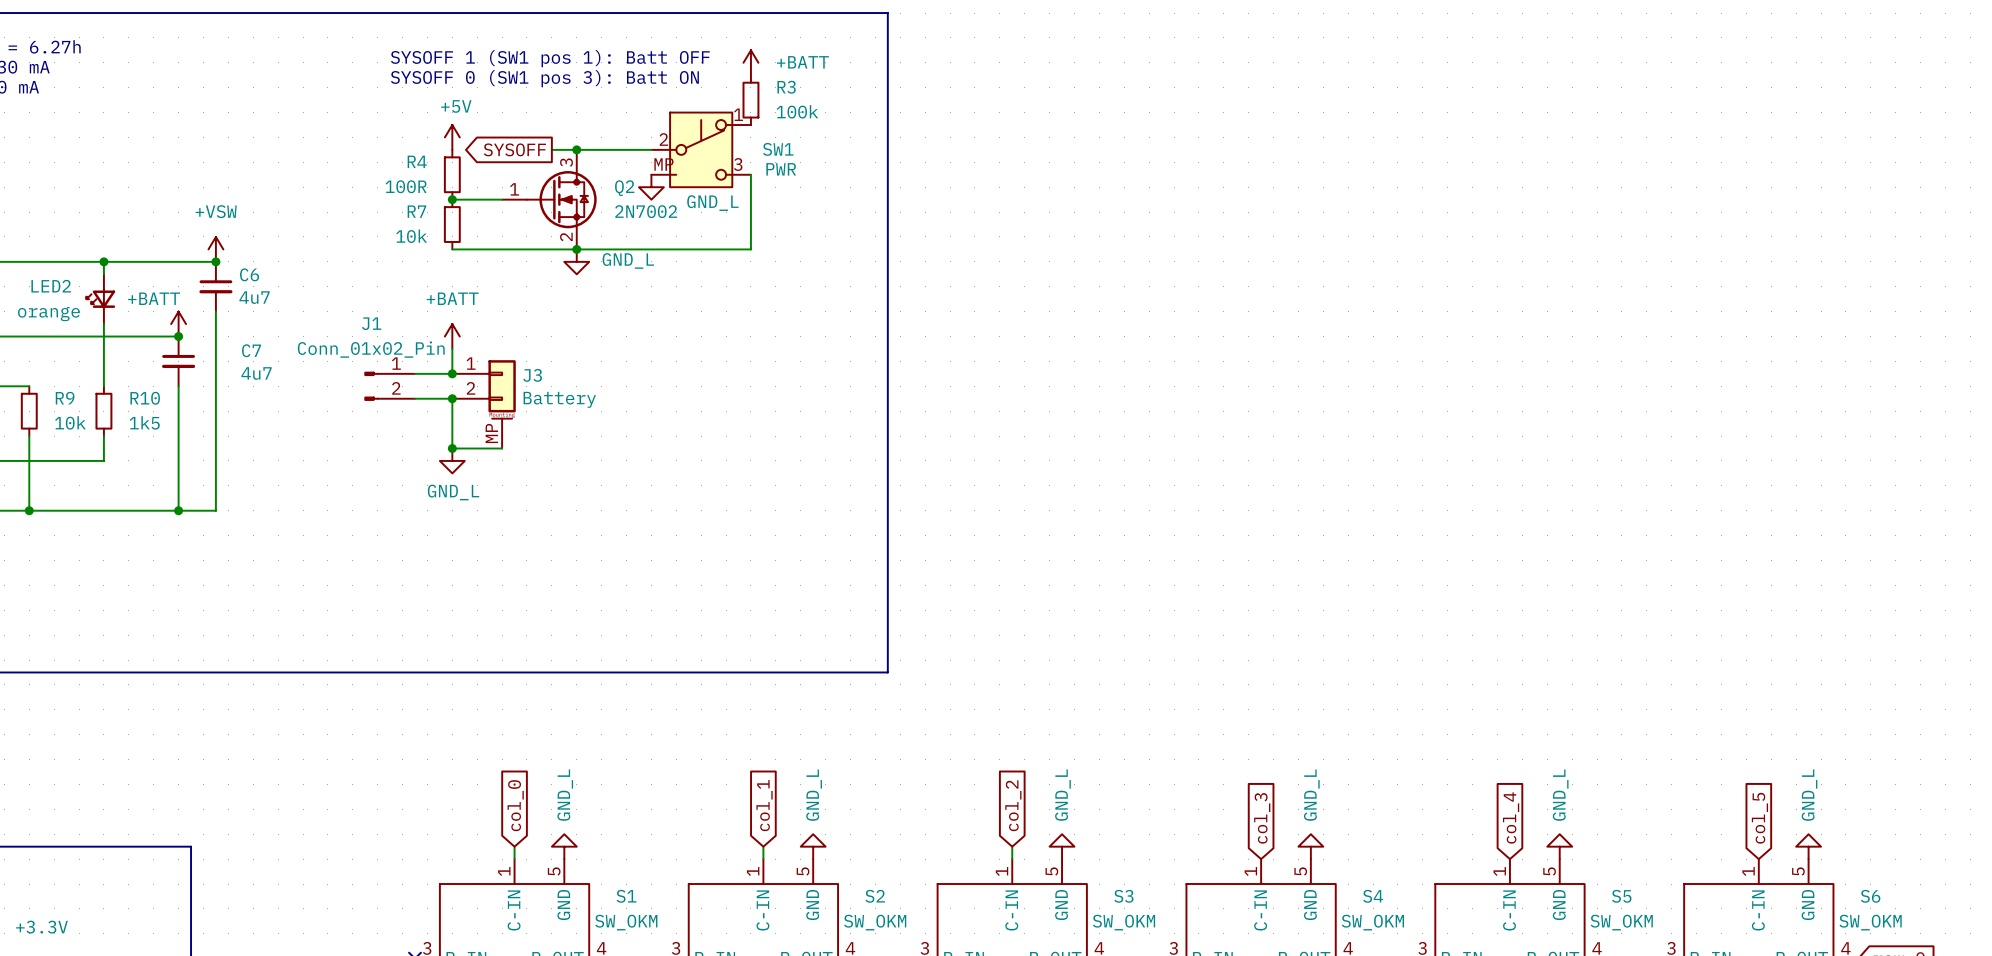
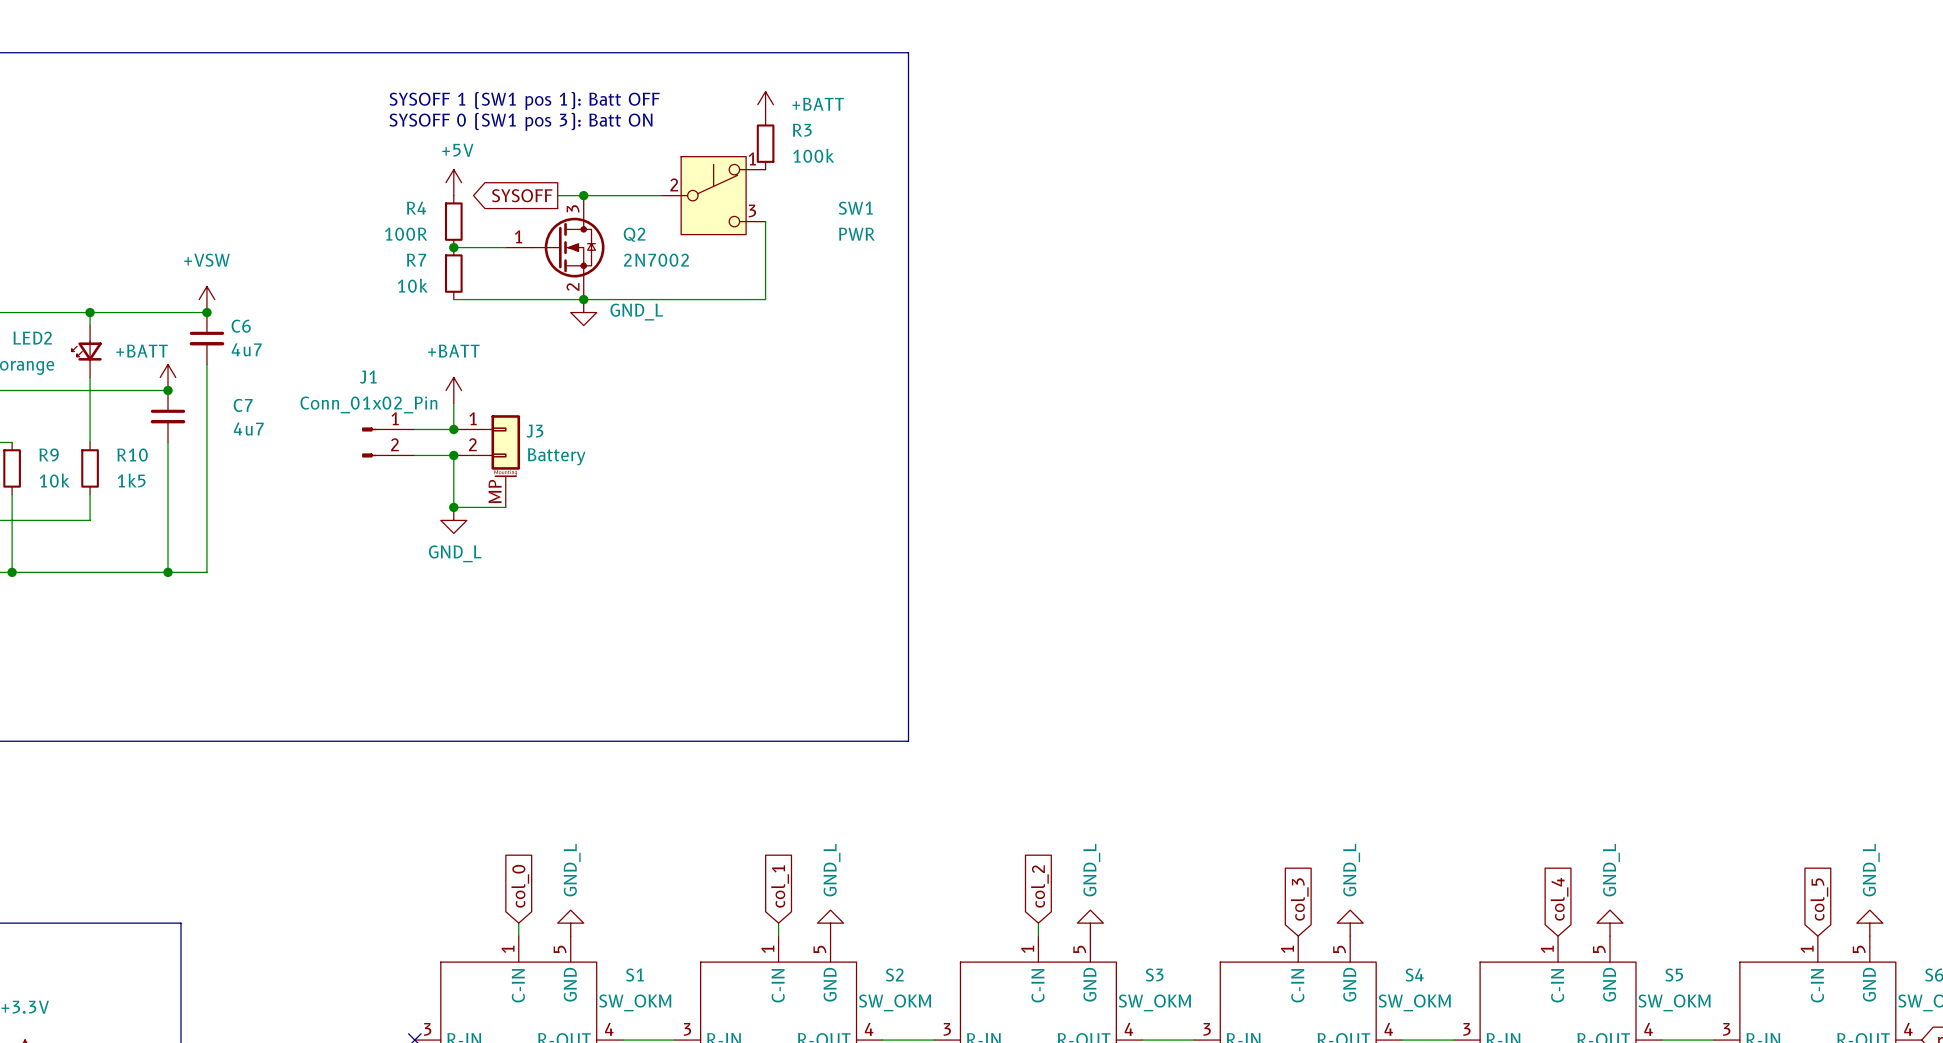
SW1 symbol: [651, 112, 751, 188] -> [661, 156, 766, 235]
SW1 name position: SW1 (778, 149) -> SW1 (855, 208)
SW1 value position: PWR (781, 169) -> PWR (856, 234)
power symbol: GND_L (651, 187) -> none

